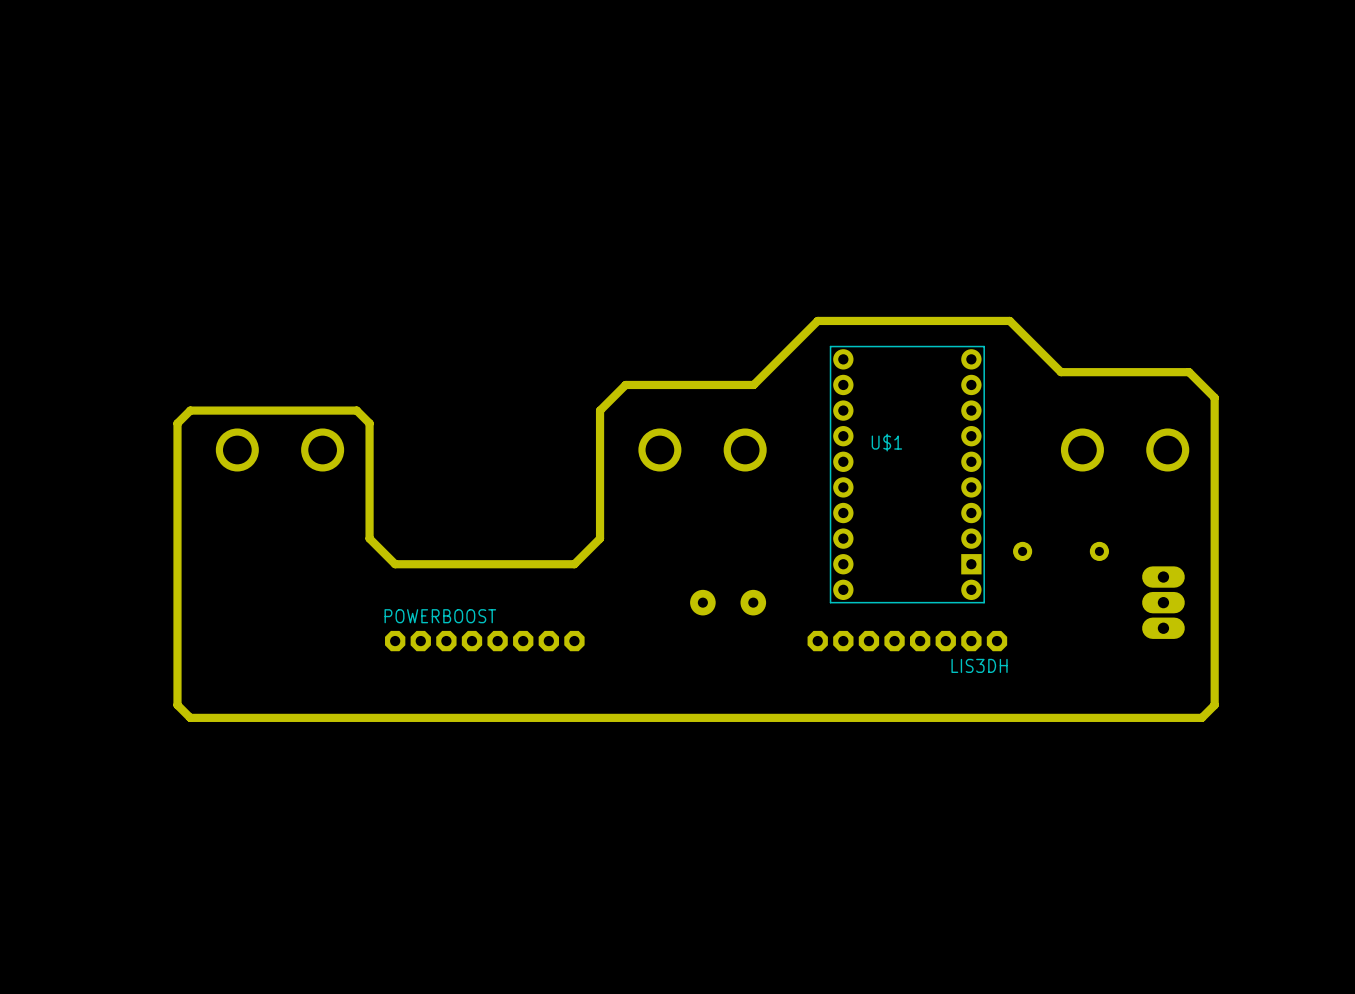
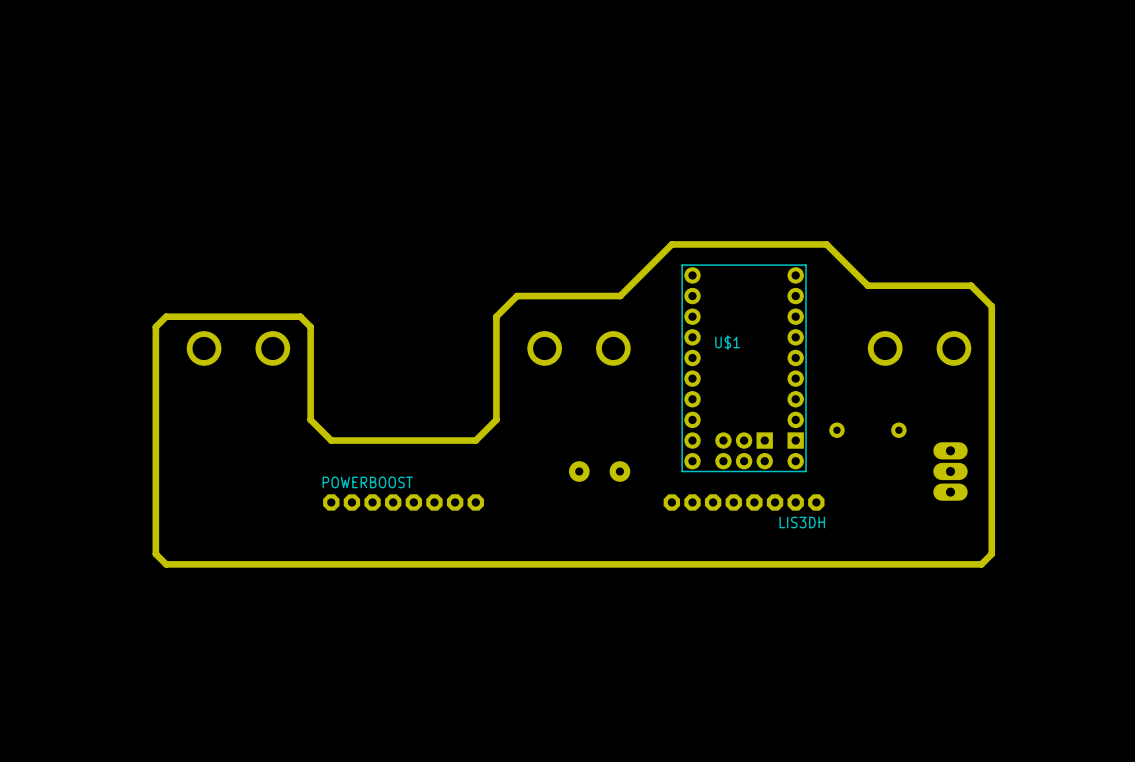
U$1 footprint: [829, 345, 985, 604] -> [681, 264, 807, 473]

